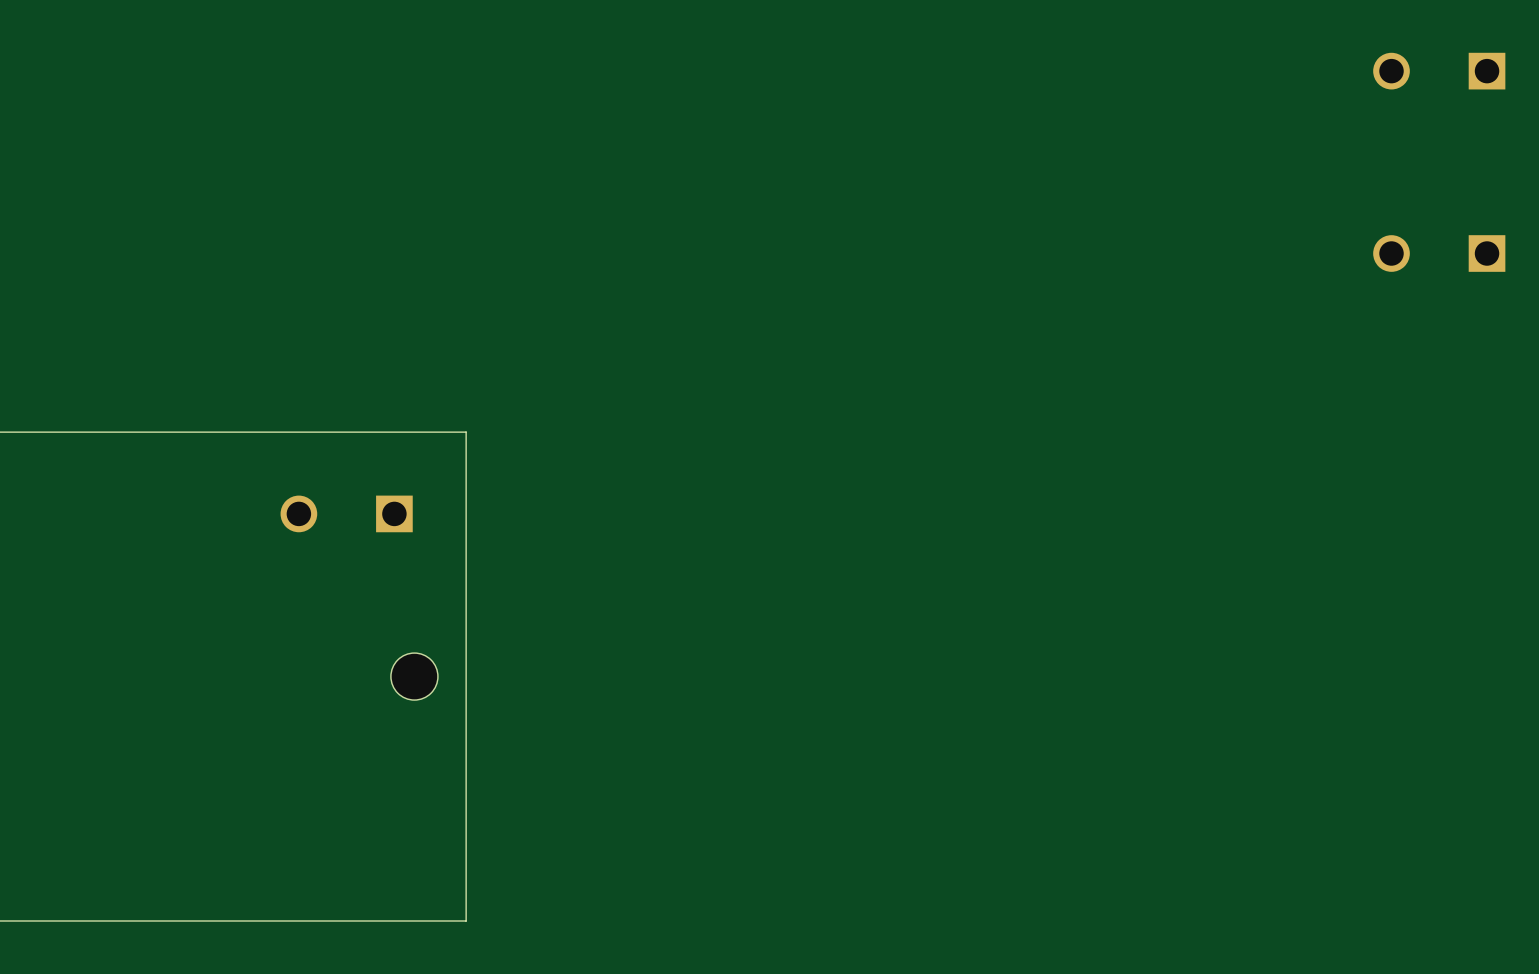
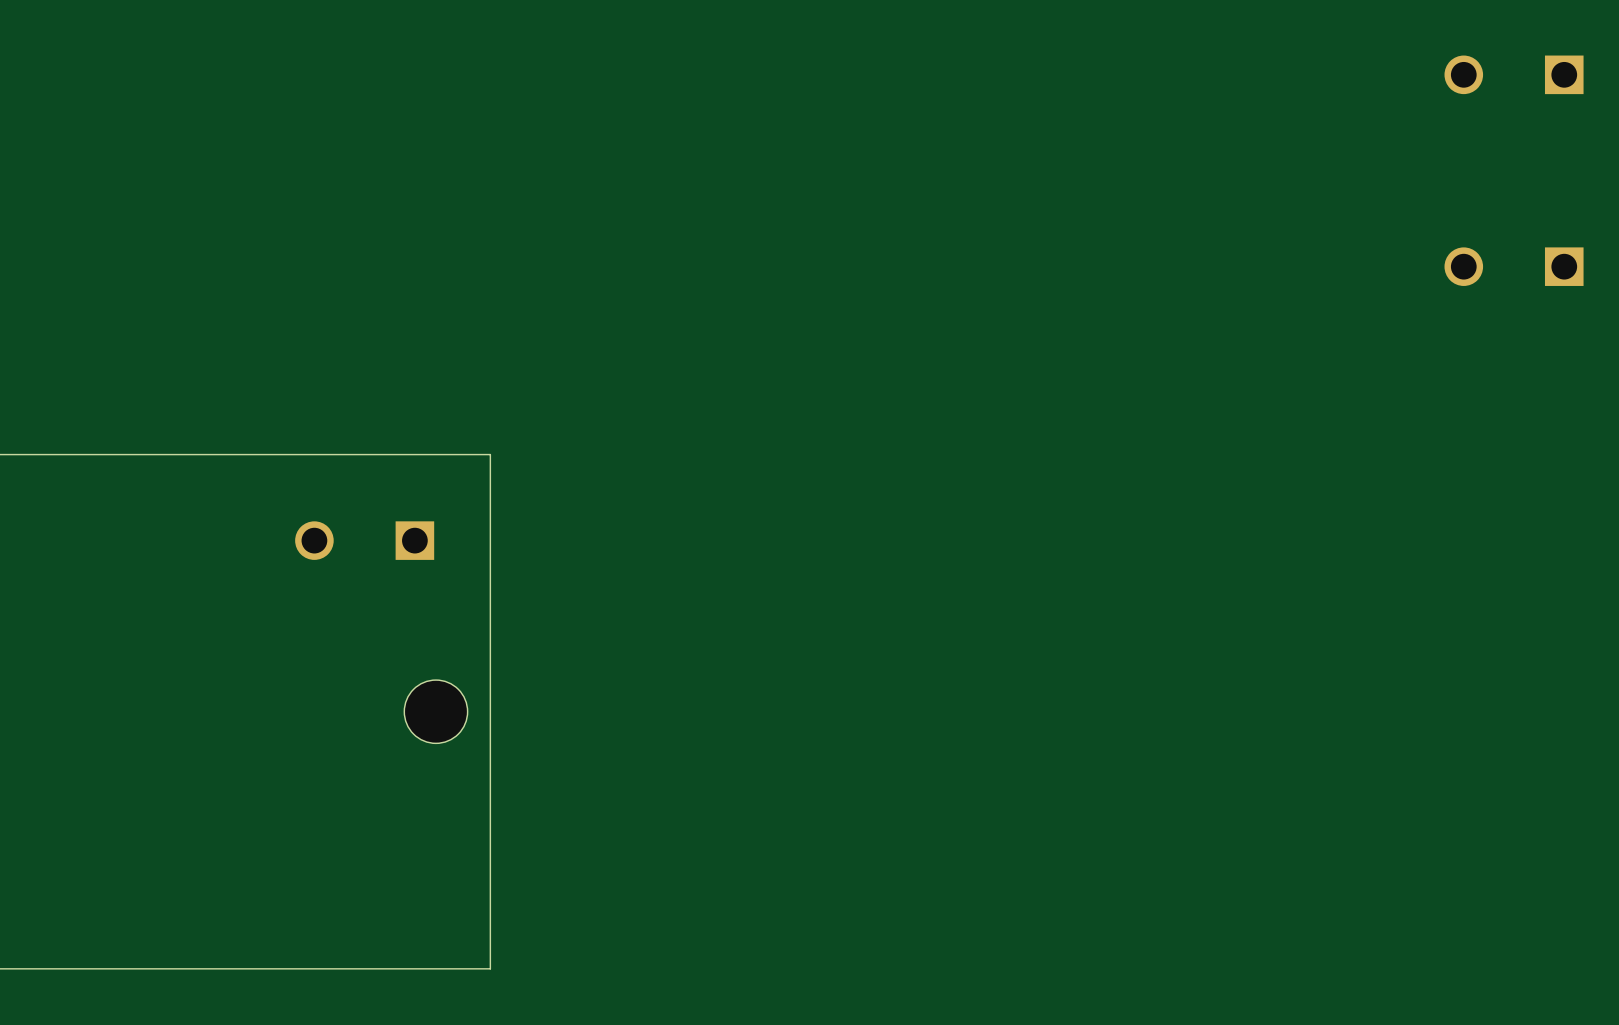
part footprint: [390, 653, 438, 701] -> [404, 680, 468, 744]

